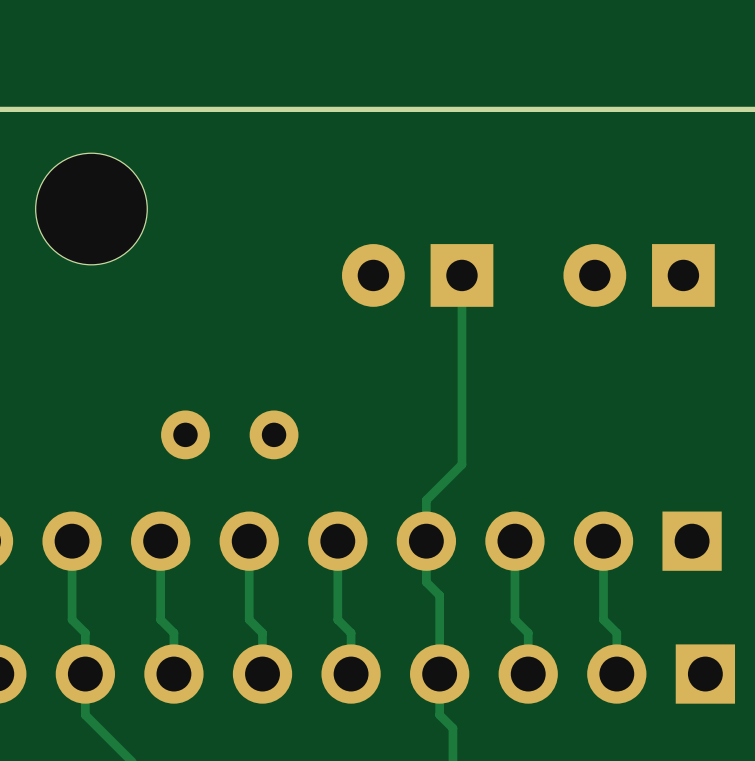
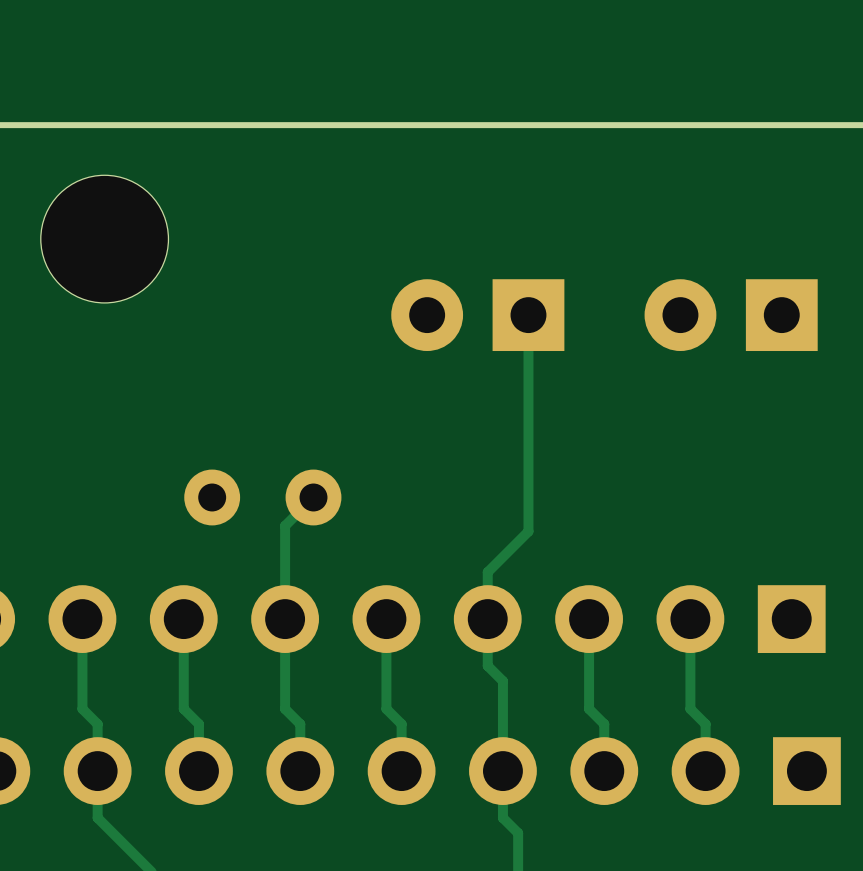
track: none -> (313, 497) (285, 525) (285, 619)

